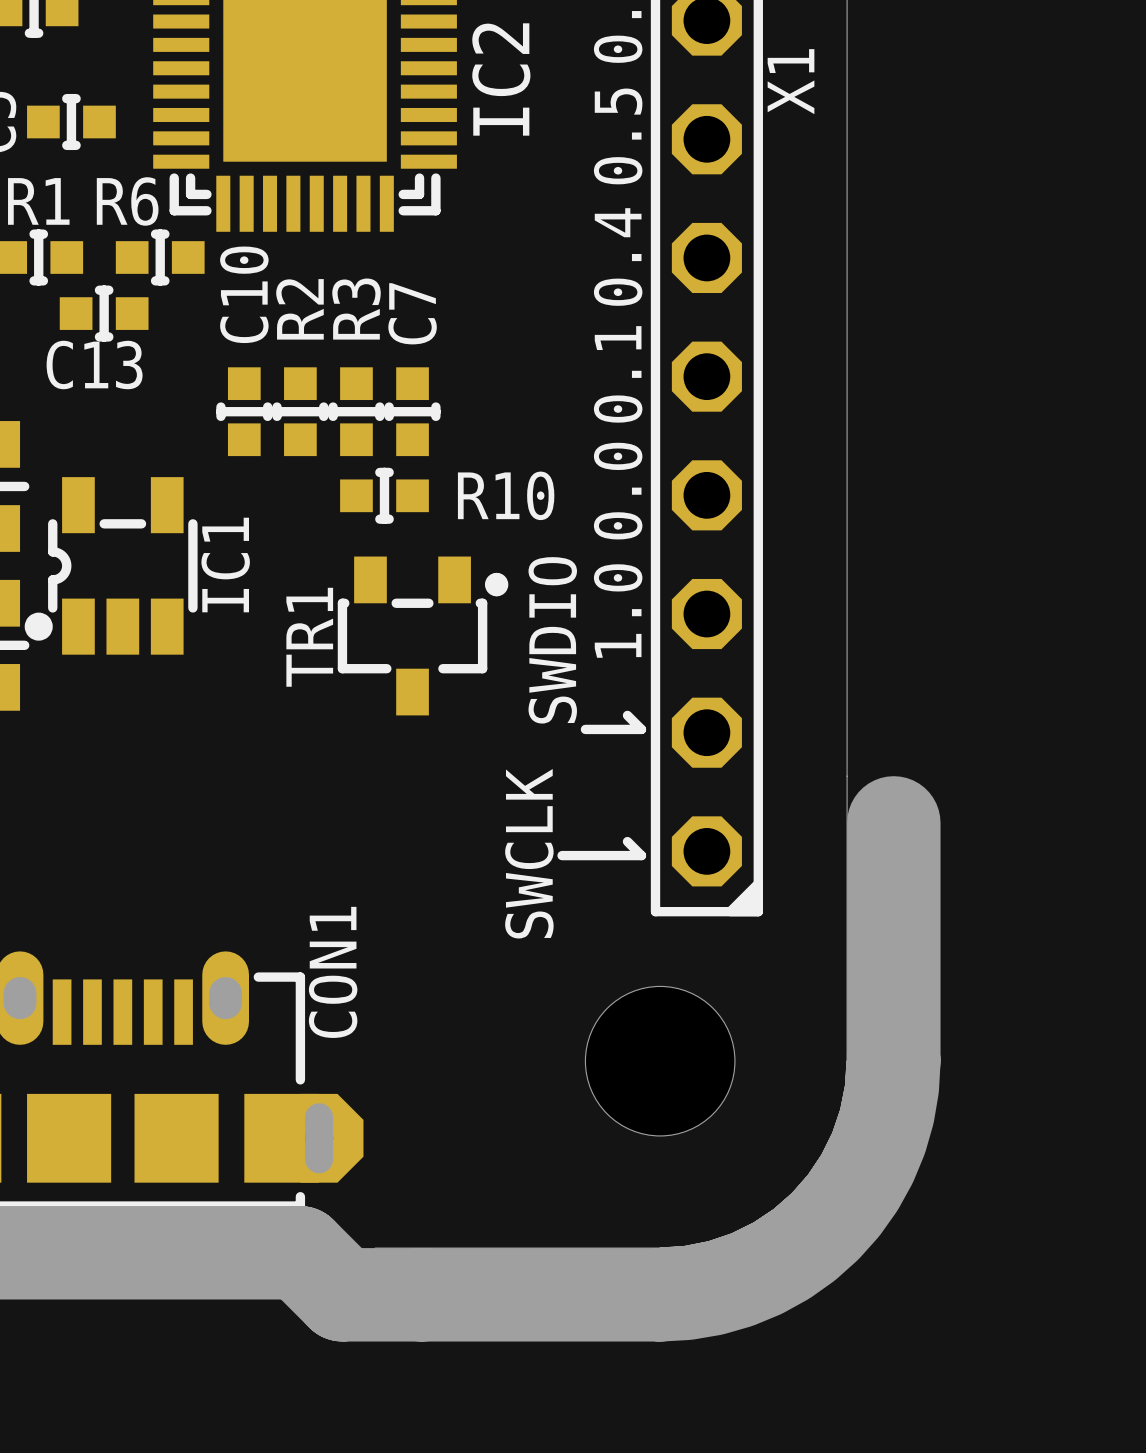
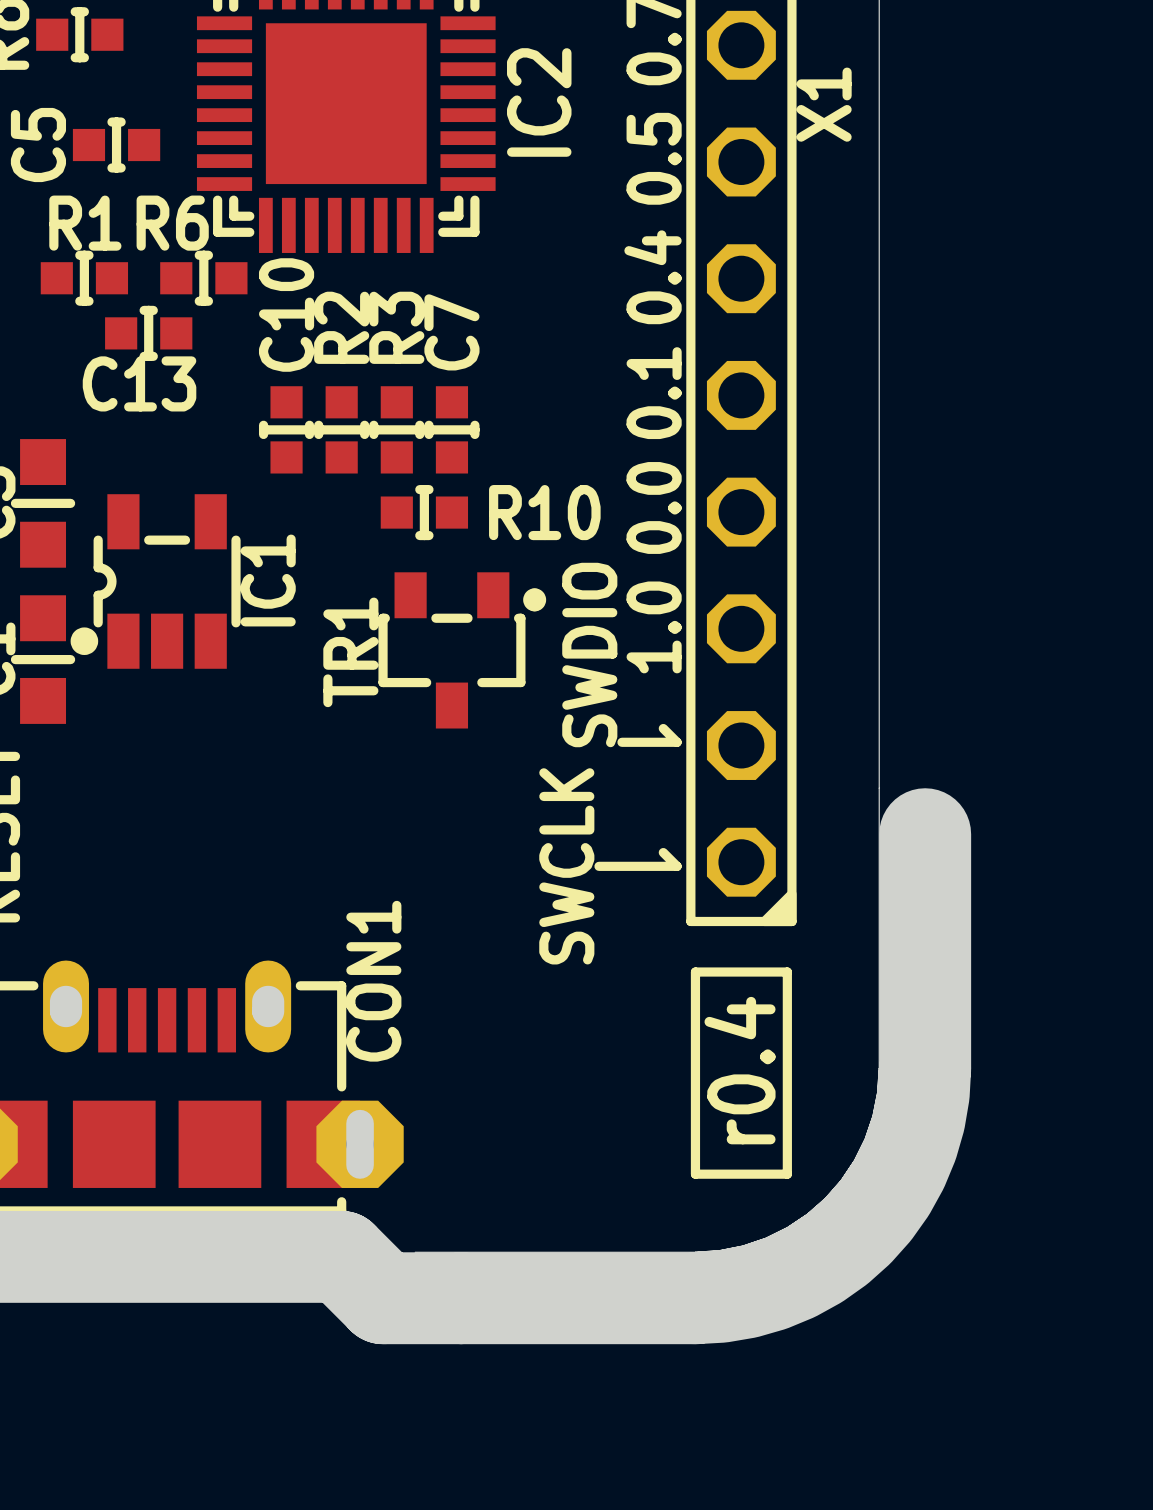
drawing: none -> [415, 788, 972, 1345]
part: (657, 1058) -> none

